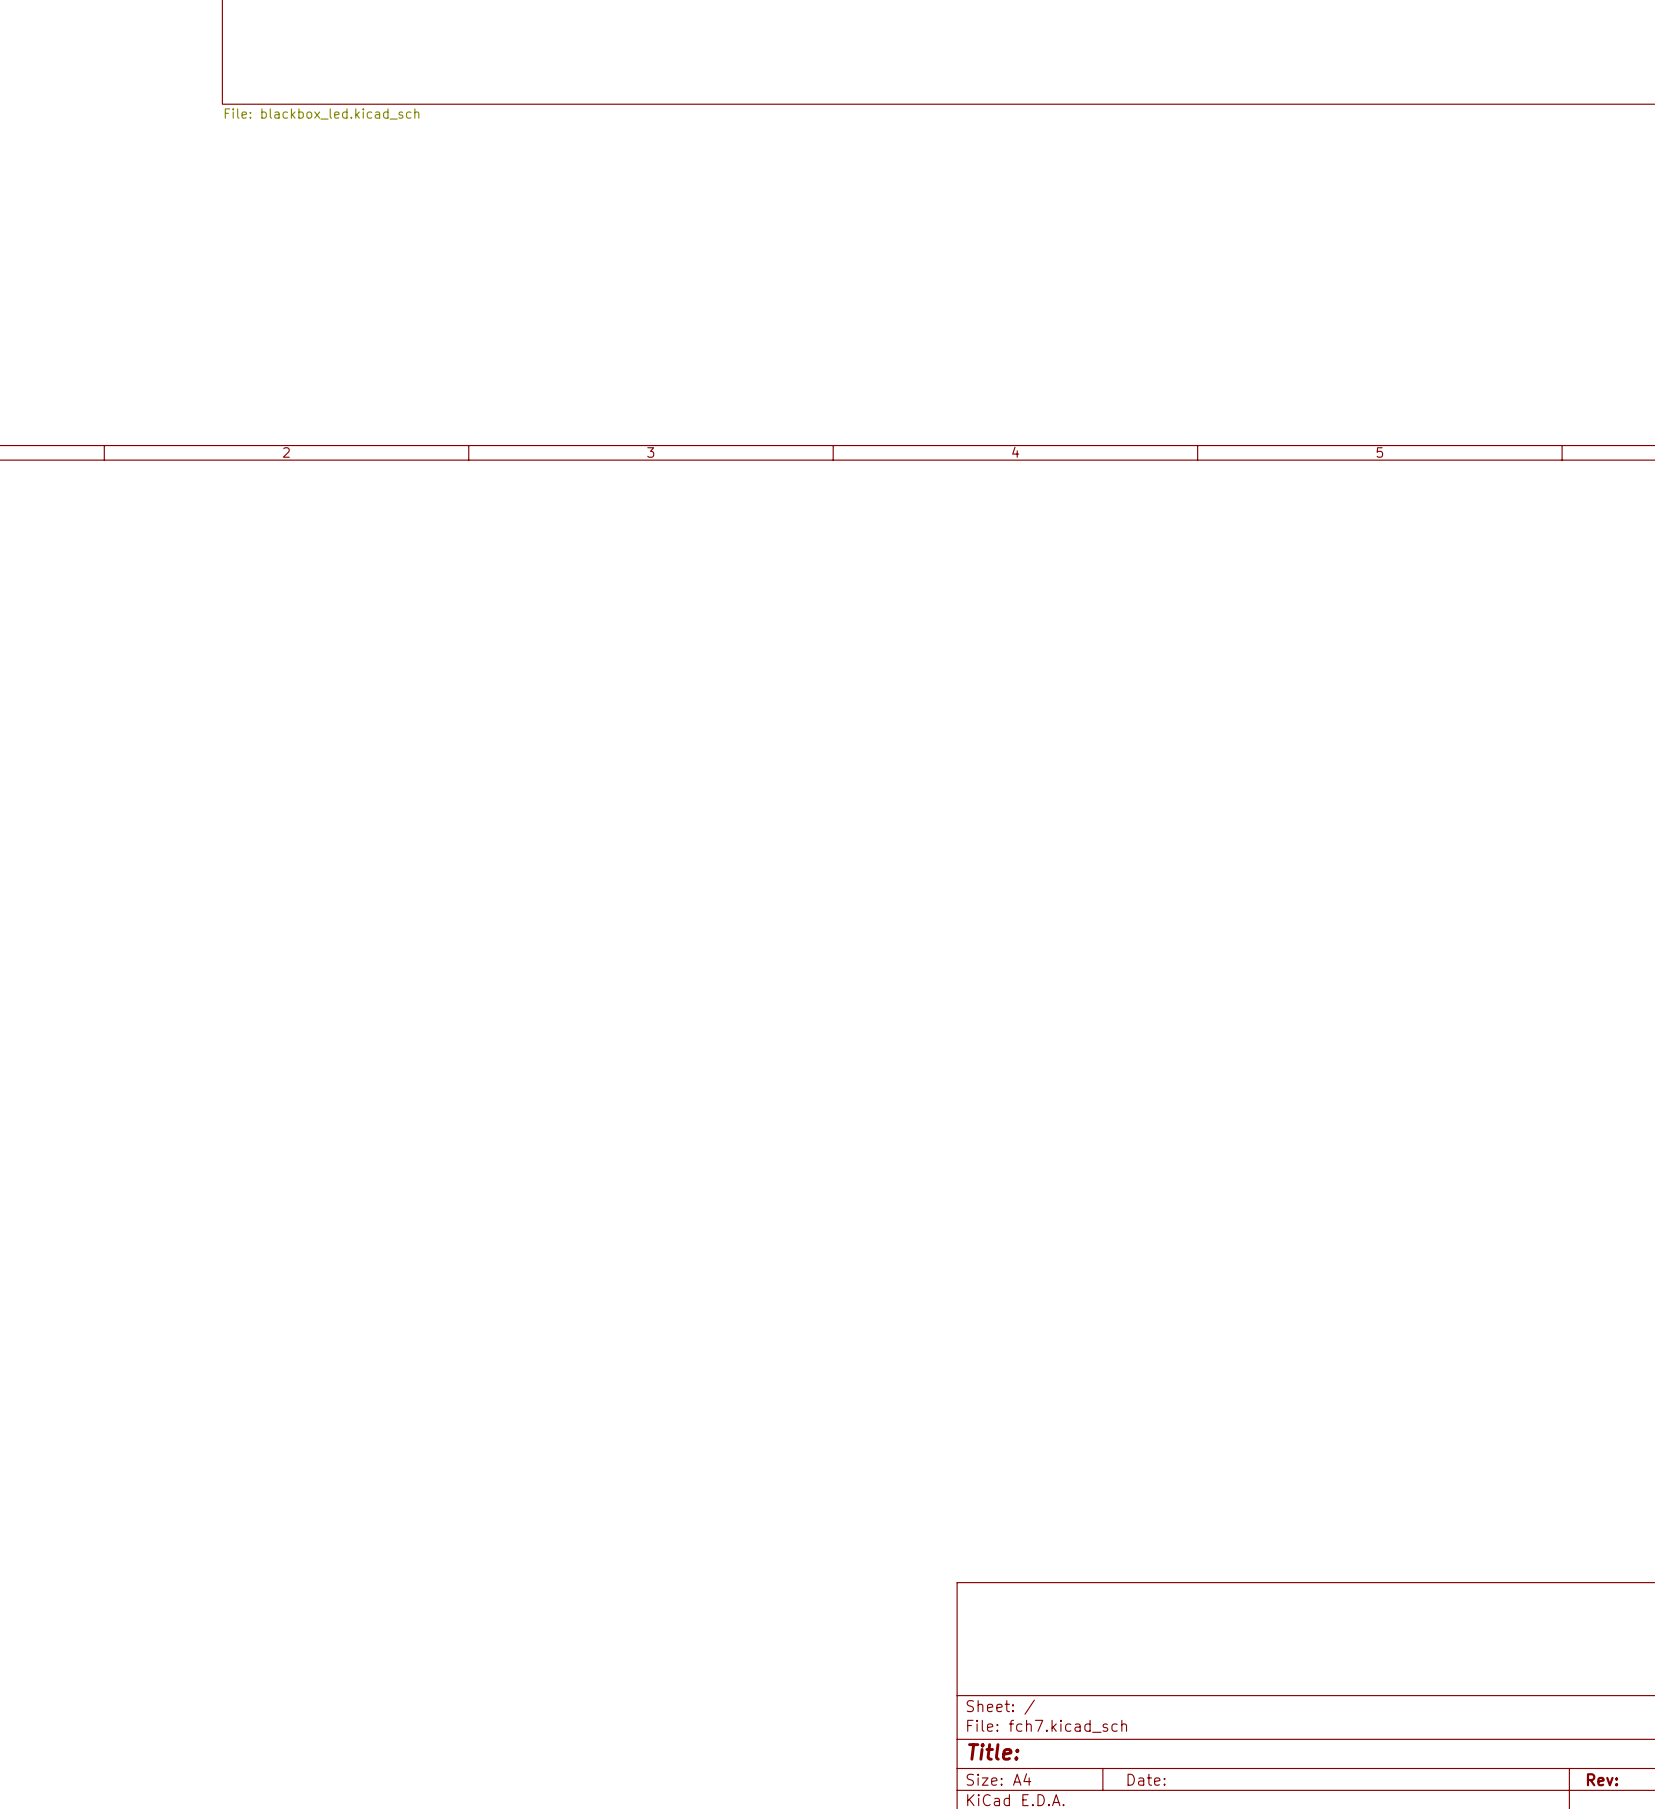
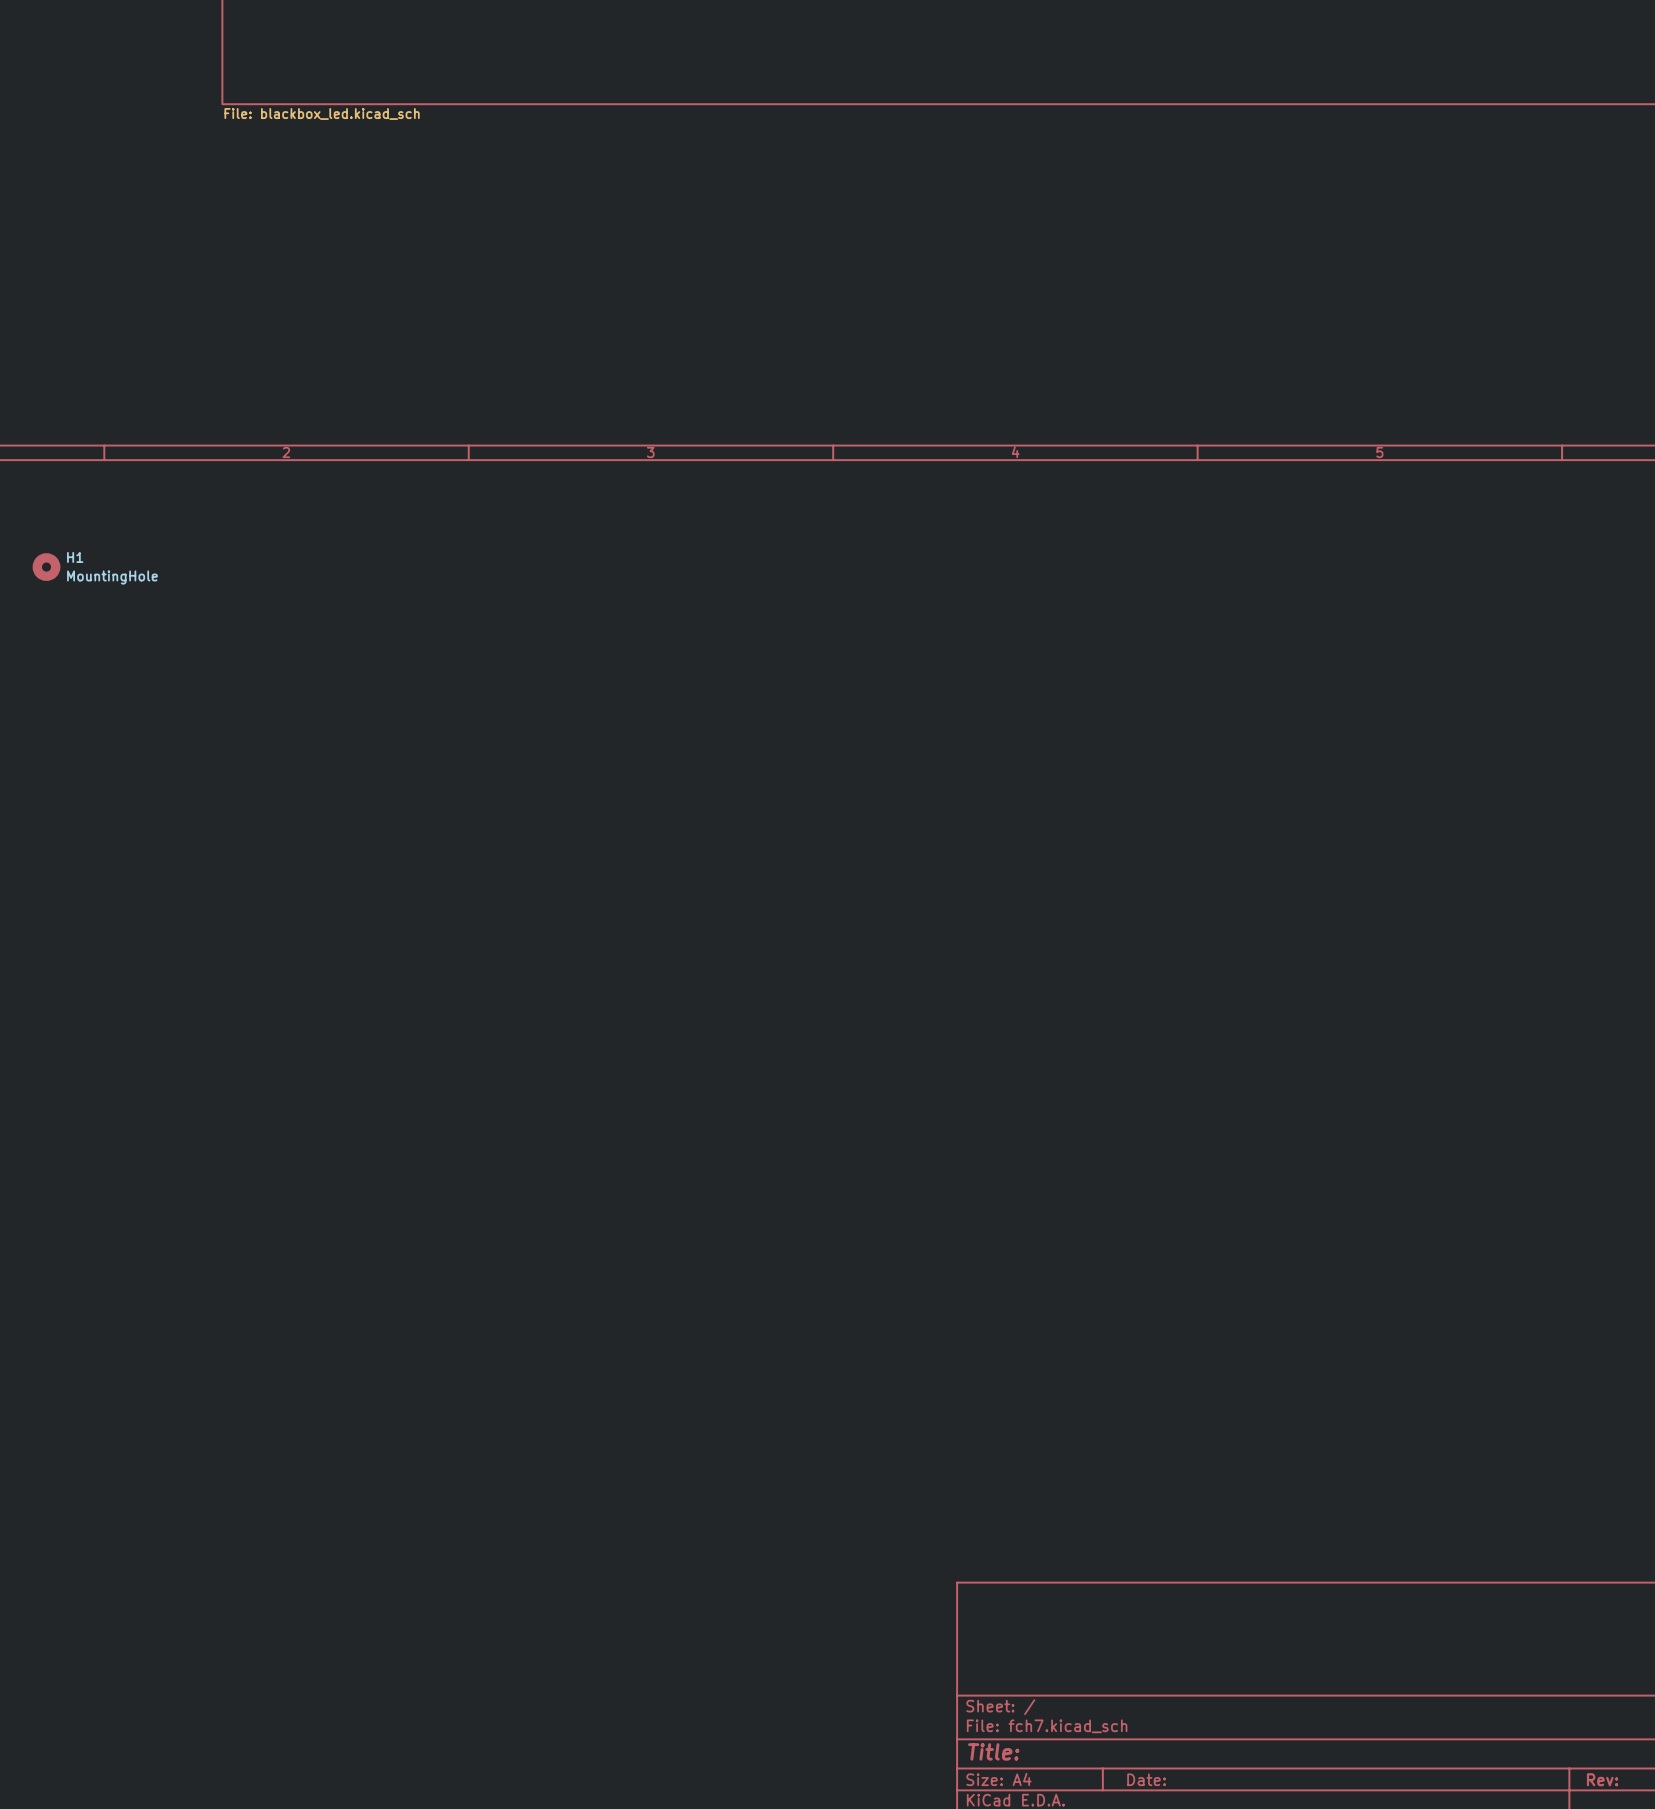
H1: none -> MountingHole (46, 567)

